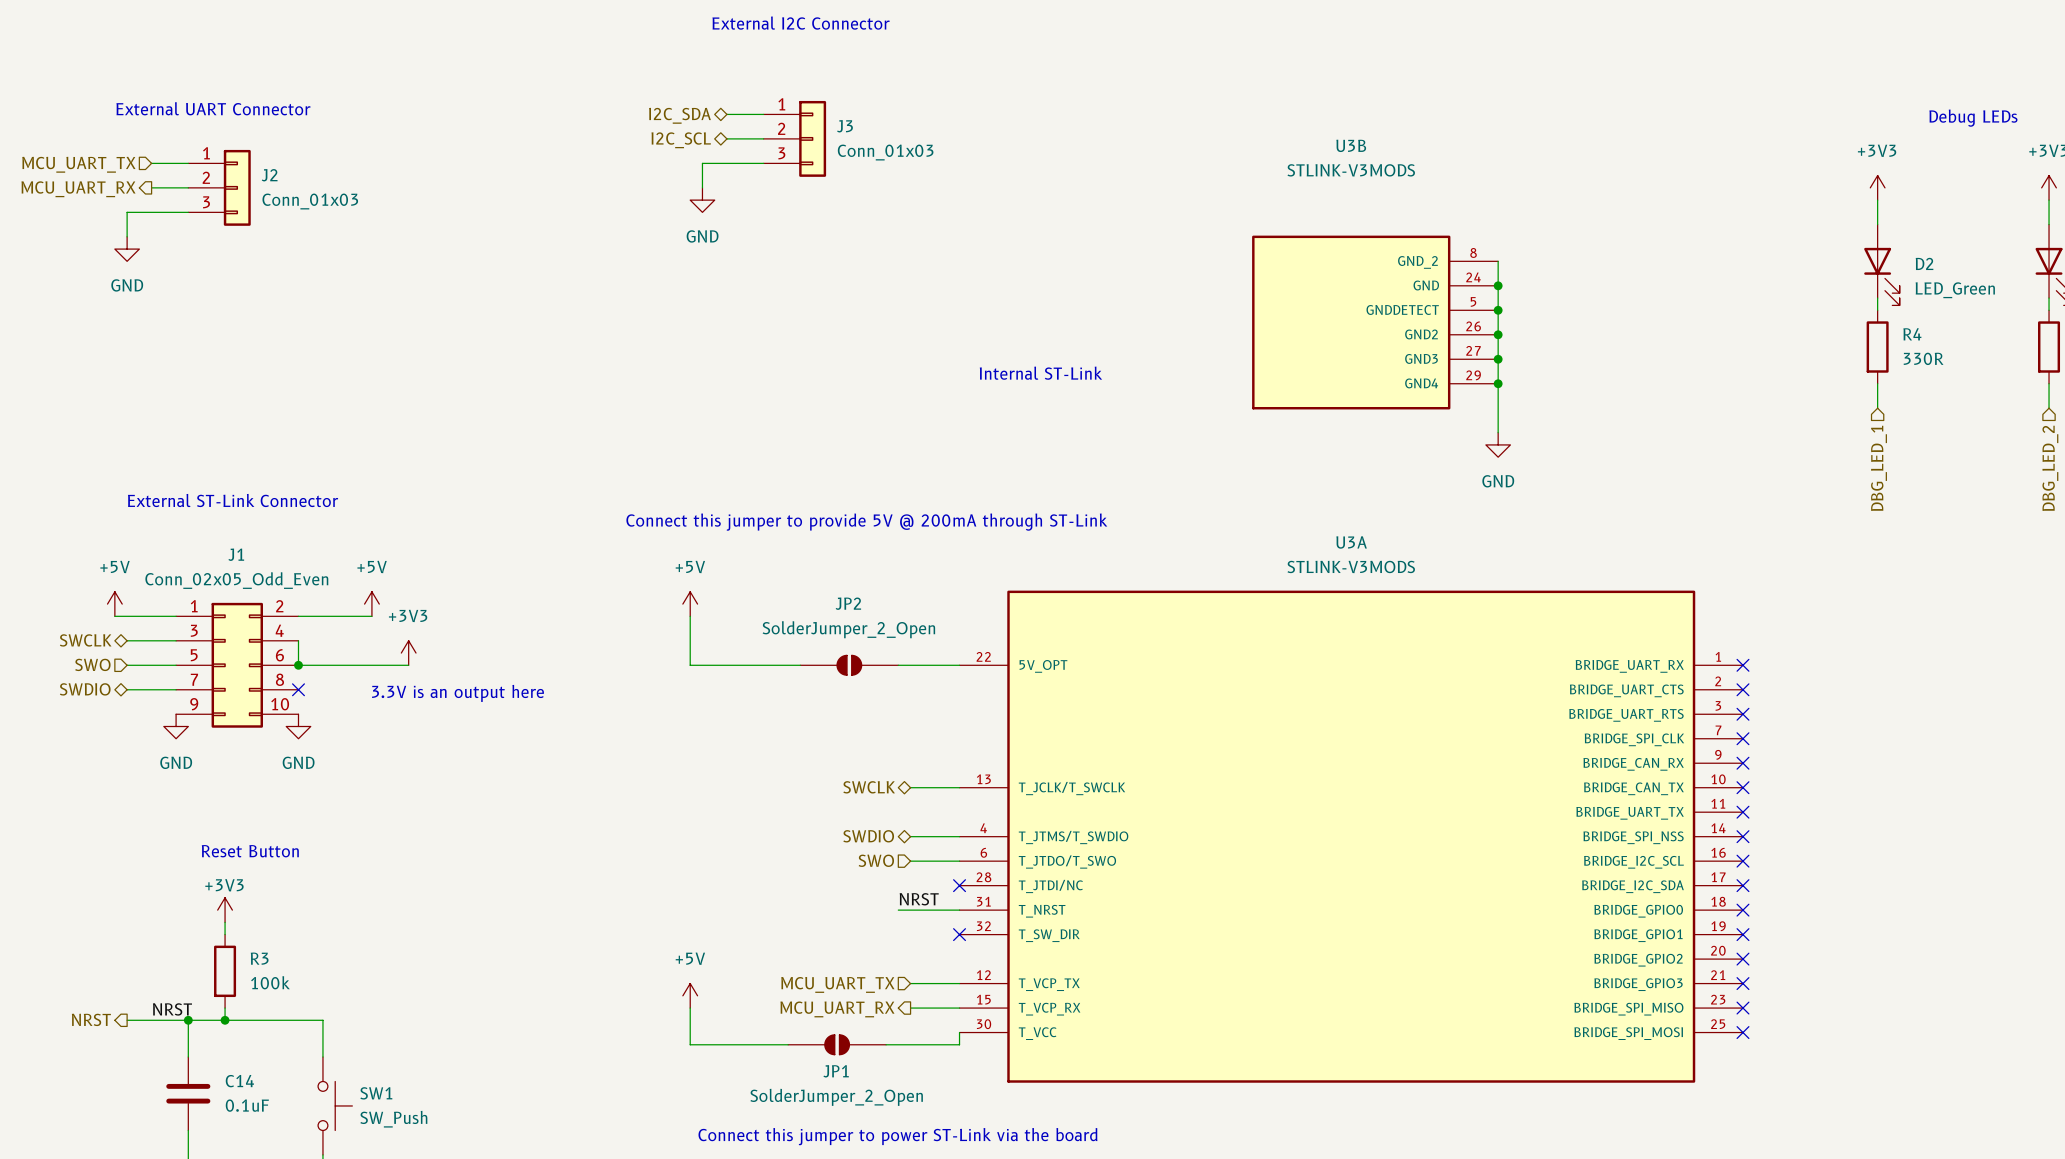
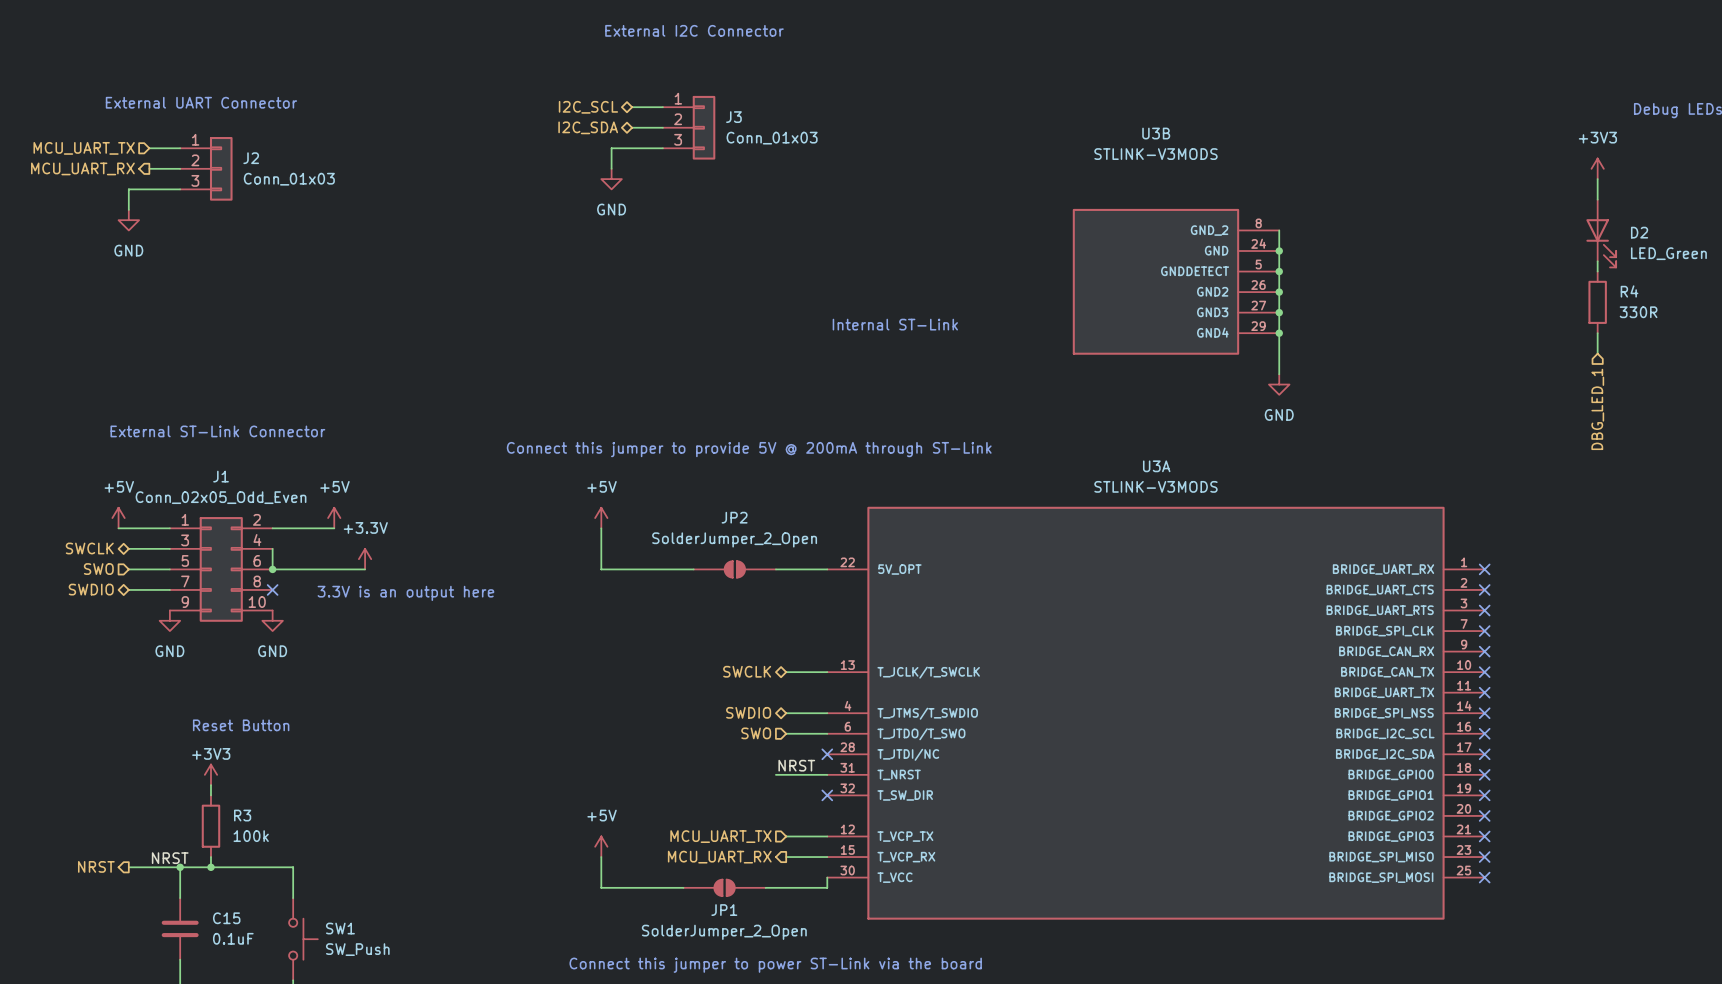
hierarchical label: I2C_SDA (679, 115) -> I2C_SCL (588, 107)
hierarchical label: I2C_SCL (681, 140) -> I2C_SDA (588, 127)
power symbol: +3V3 (408, 653) -> +3.3V (365, 559)
C14 name: C14 (239, 1081) -> C15 (226, 918)

